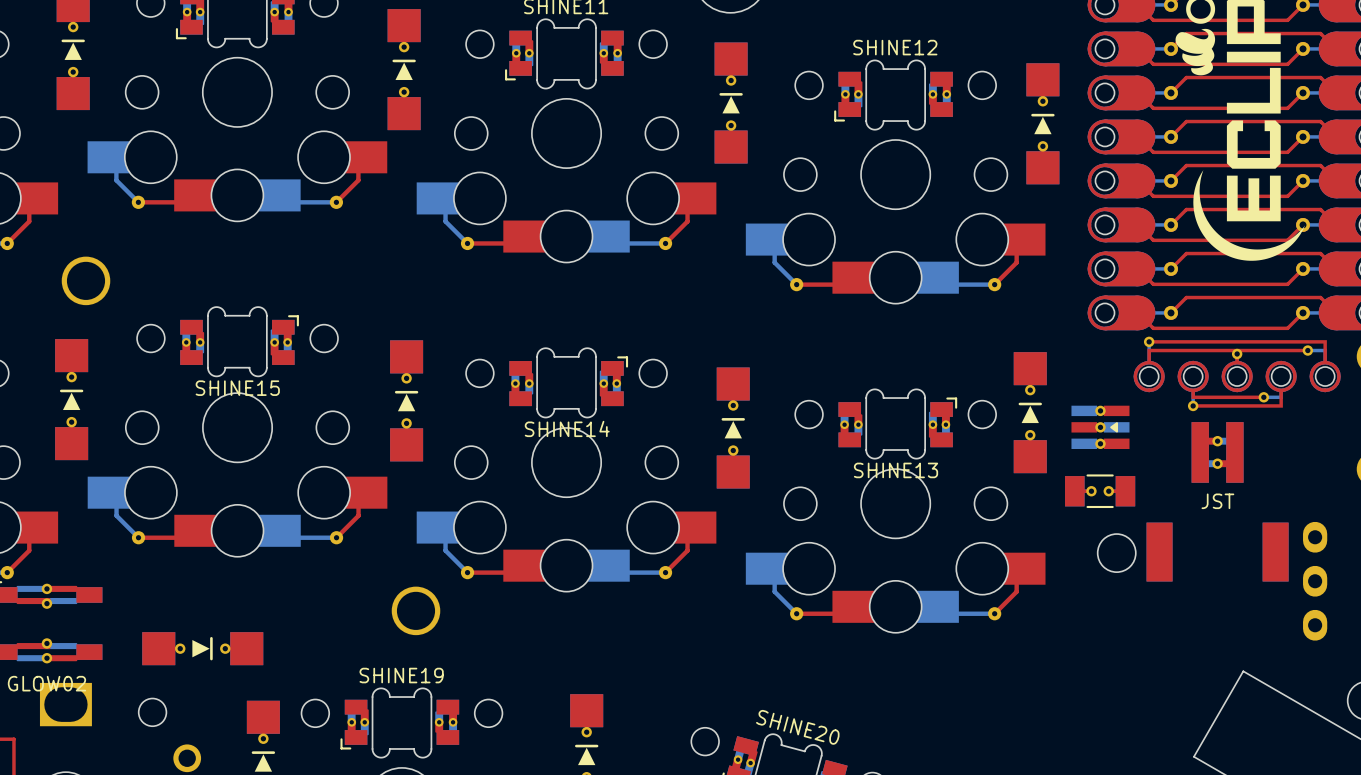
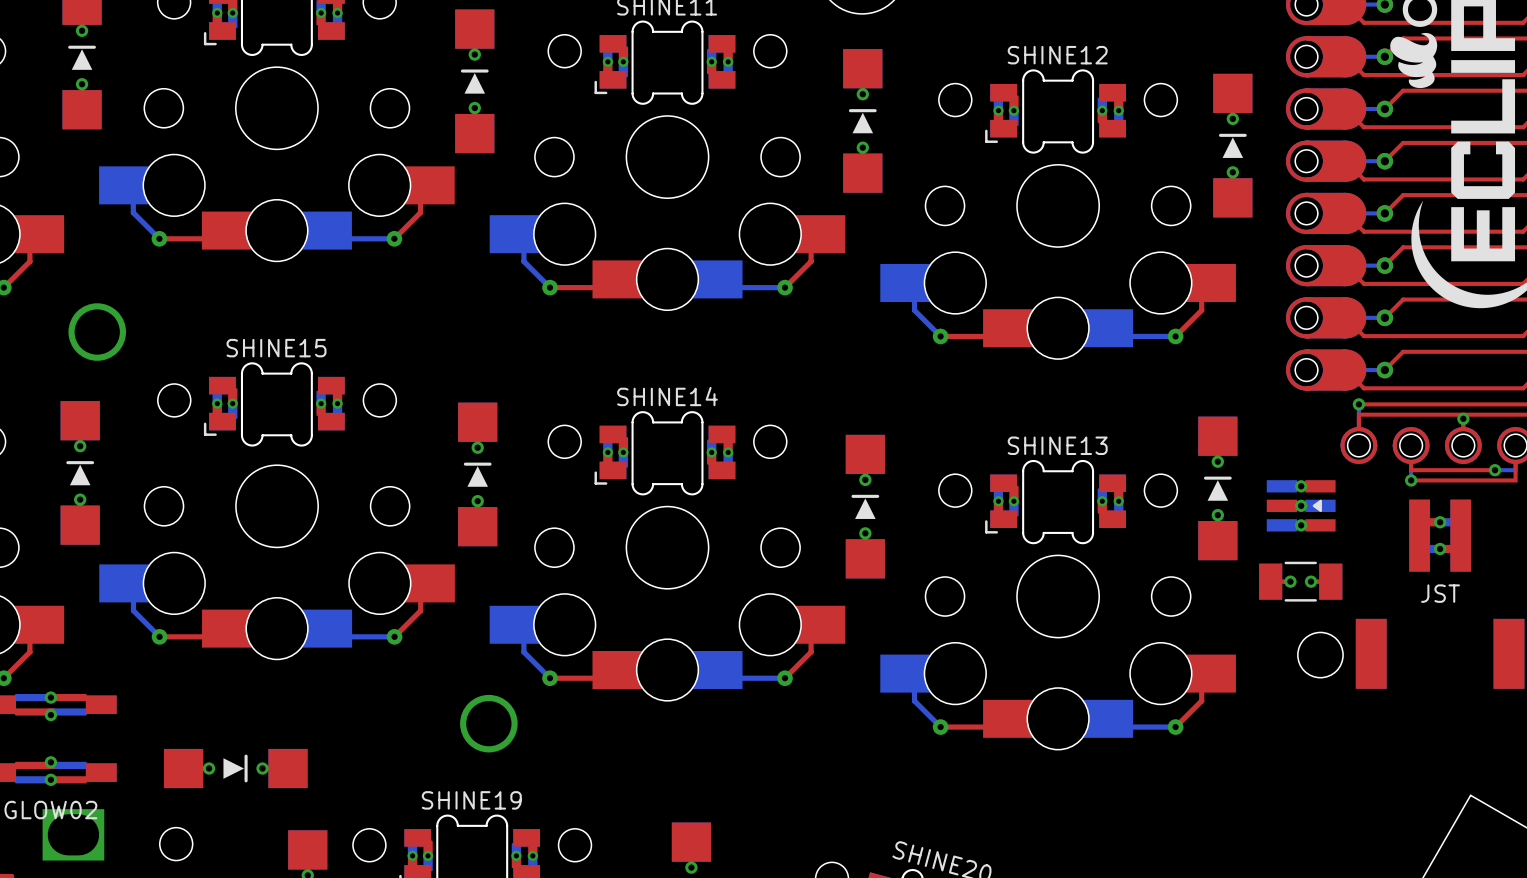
SHINE15 rotation: 0° (239, 341) -> 180° (274, 404)
SHINE14 rotation: 0° (568, 382) -> 180° (664, 453)
SHINE13 rotation: 0° (897, 424) -> 180° (1055, 502)

